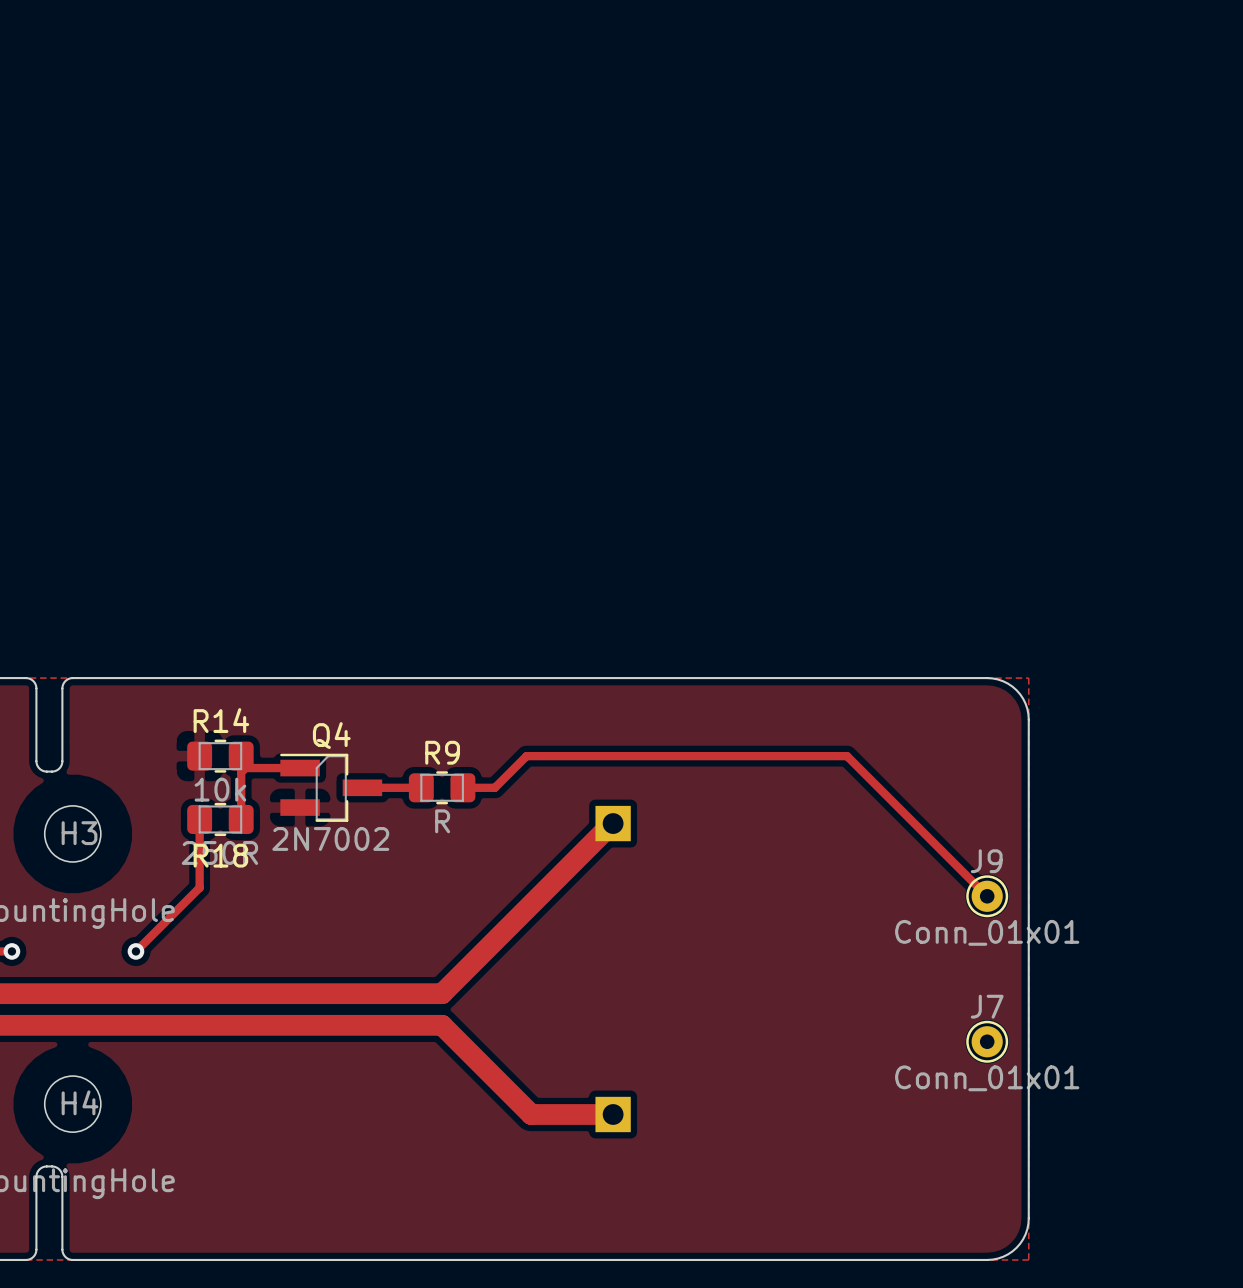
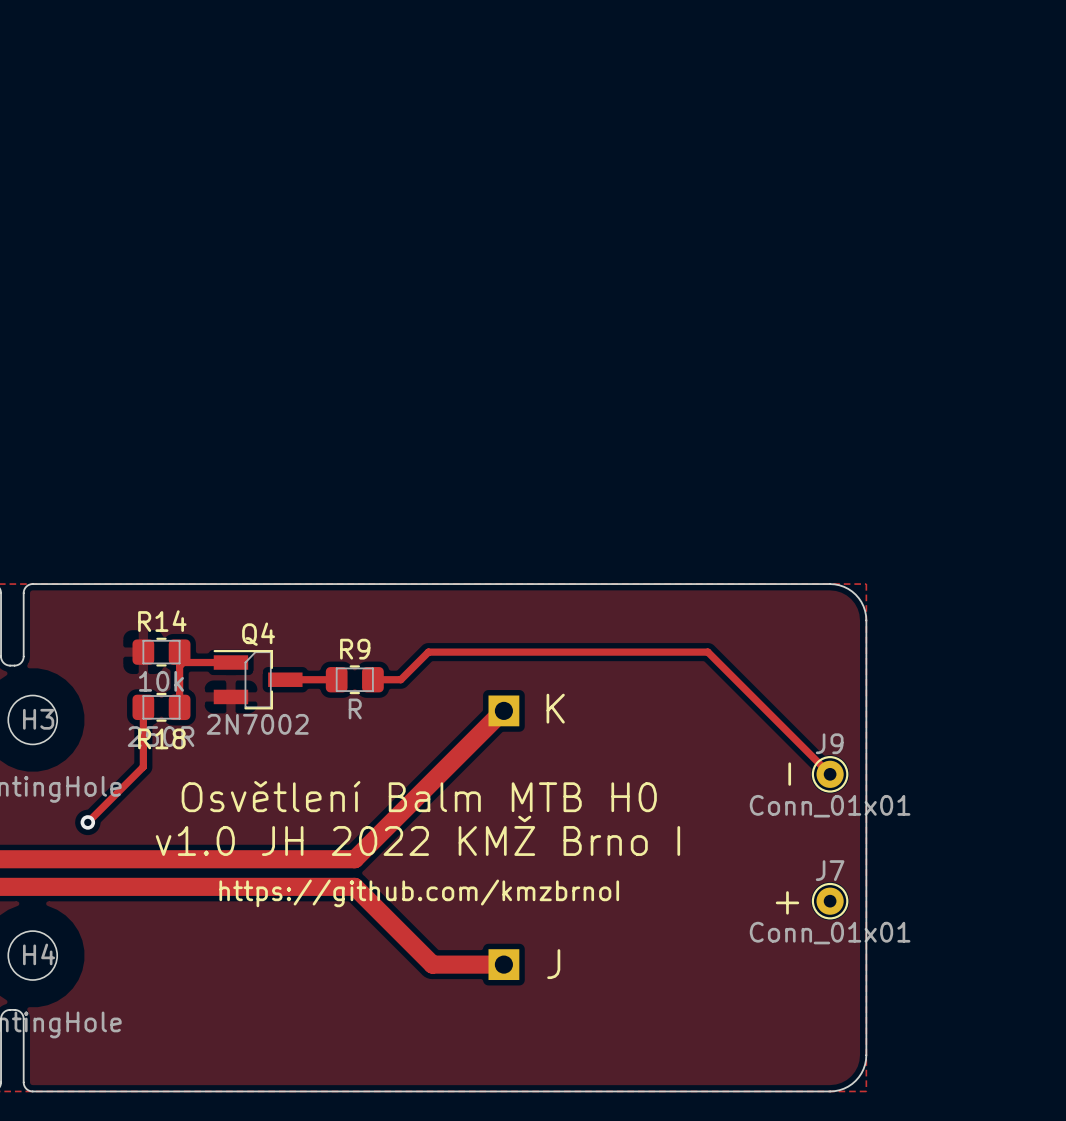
text: none -> K (555, 708)
text: none -> - (789, 774)
text: none -> Osvětlení Balm MTB H0 (419, 796)
text: none -> v1.0 JH 2022 KMŽ Brno I (417, 835)
text: none -> https://github.com/kmzbrnoI (419, 893)
text: none -> + (787, 902)
text: none -> J (553, 964)

